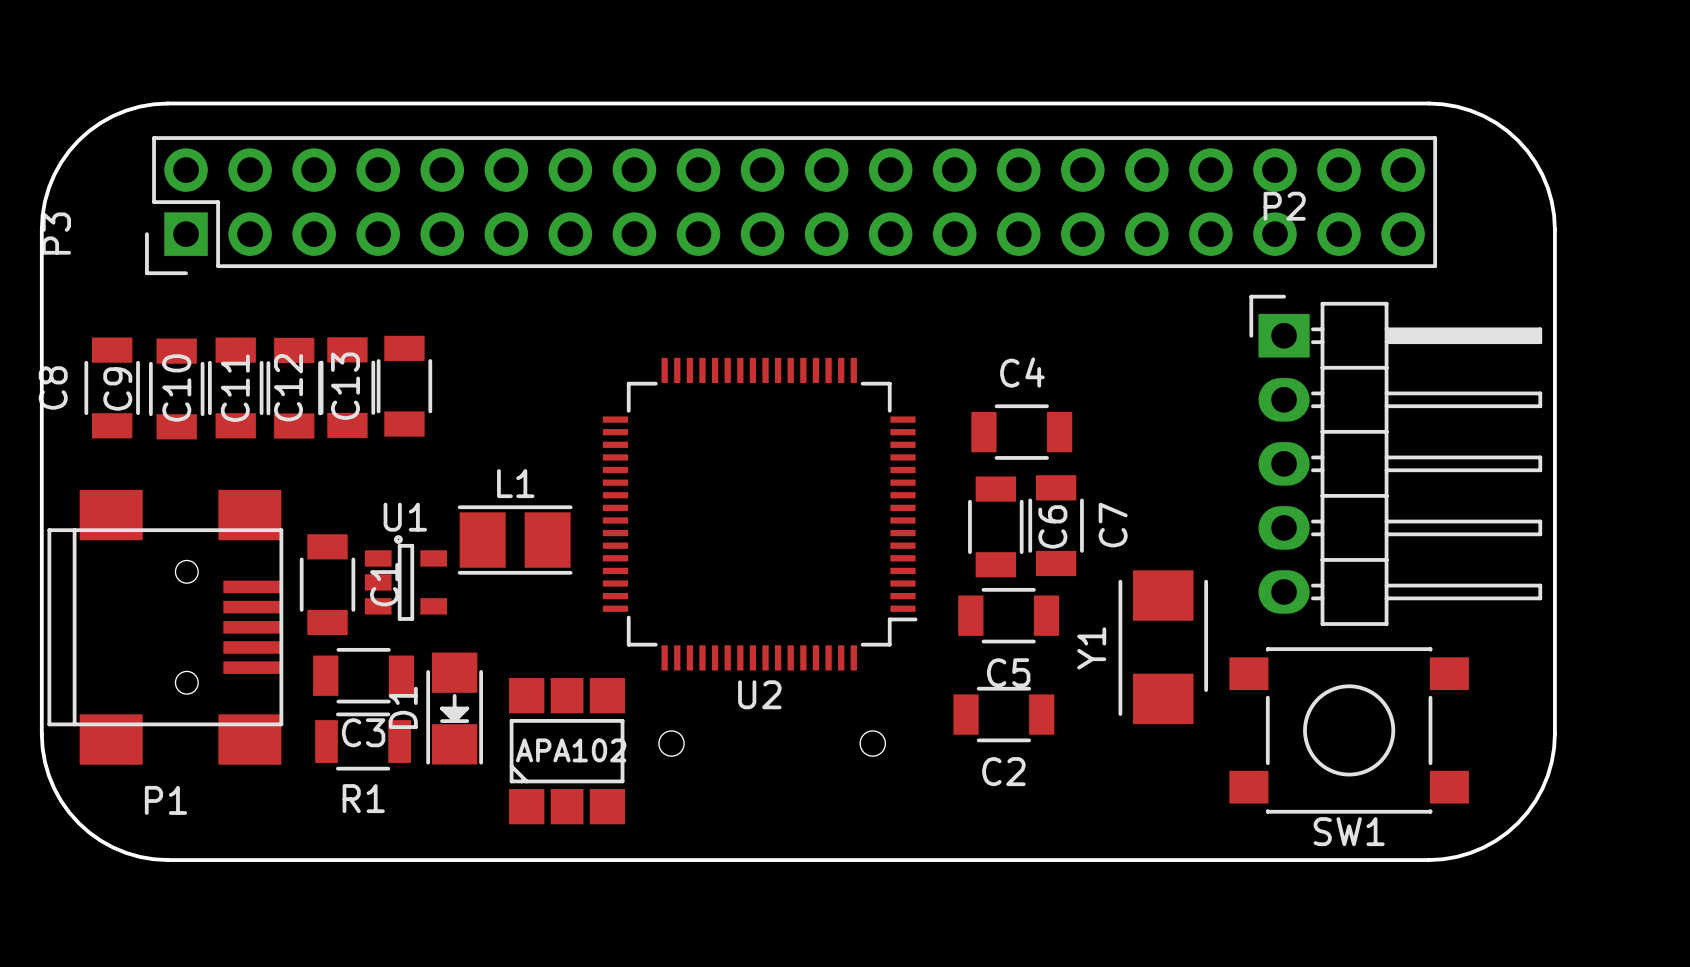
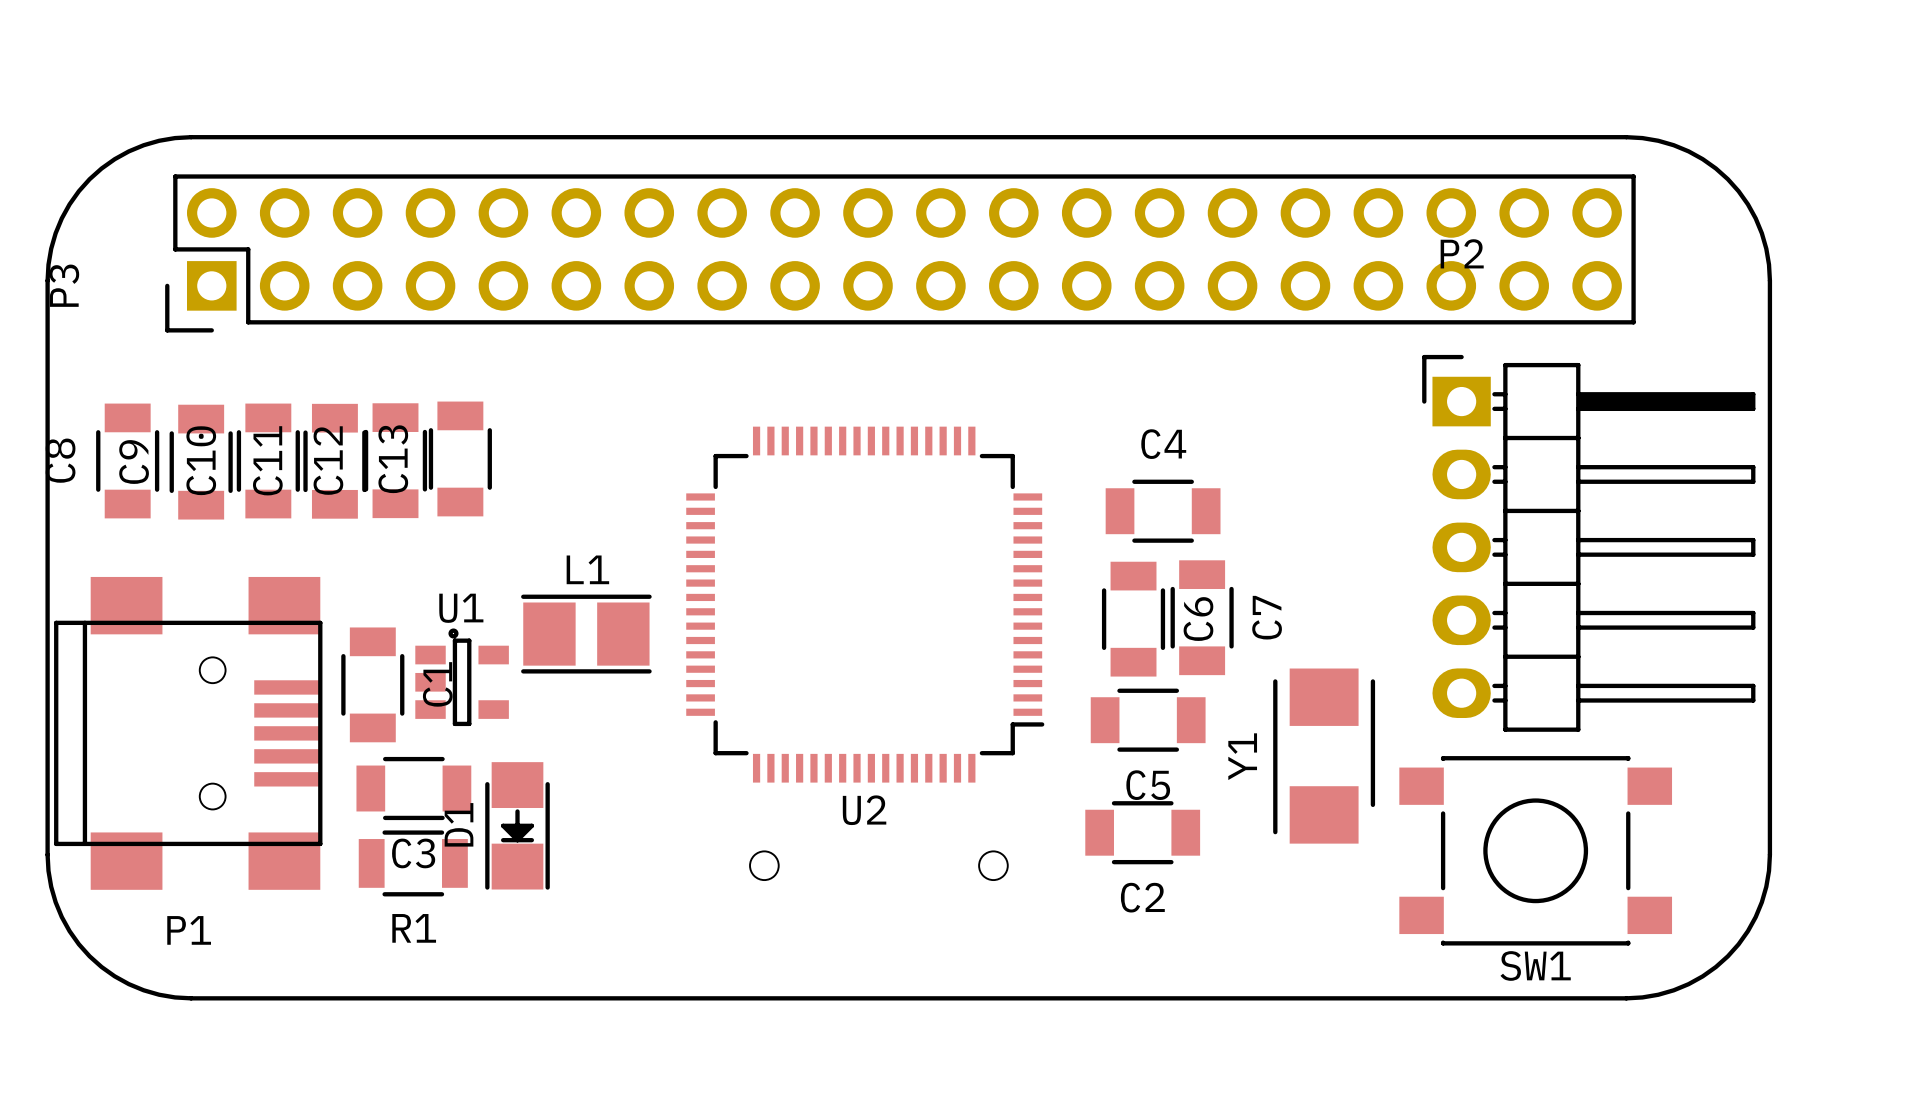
part: APA102 (567, 751) -> none

